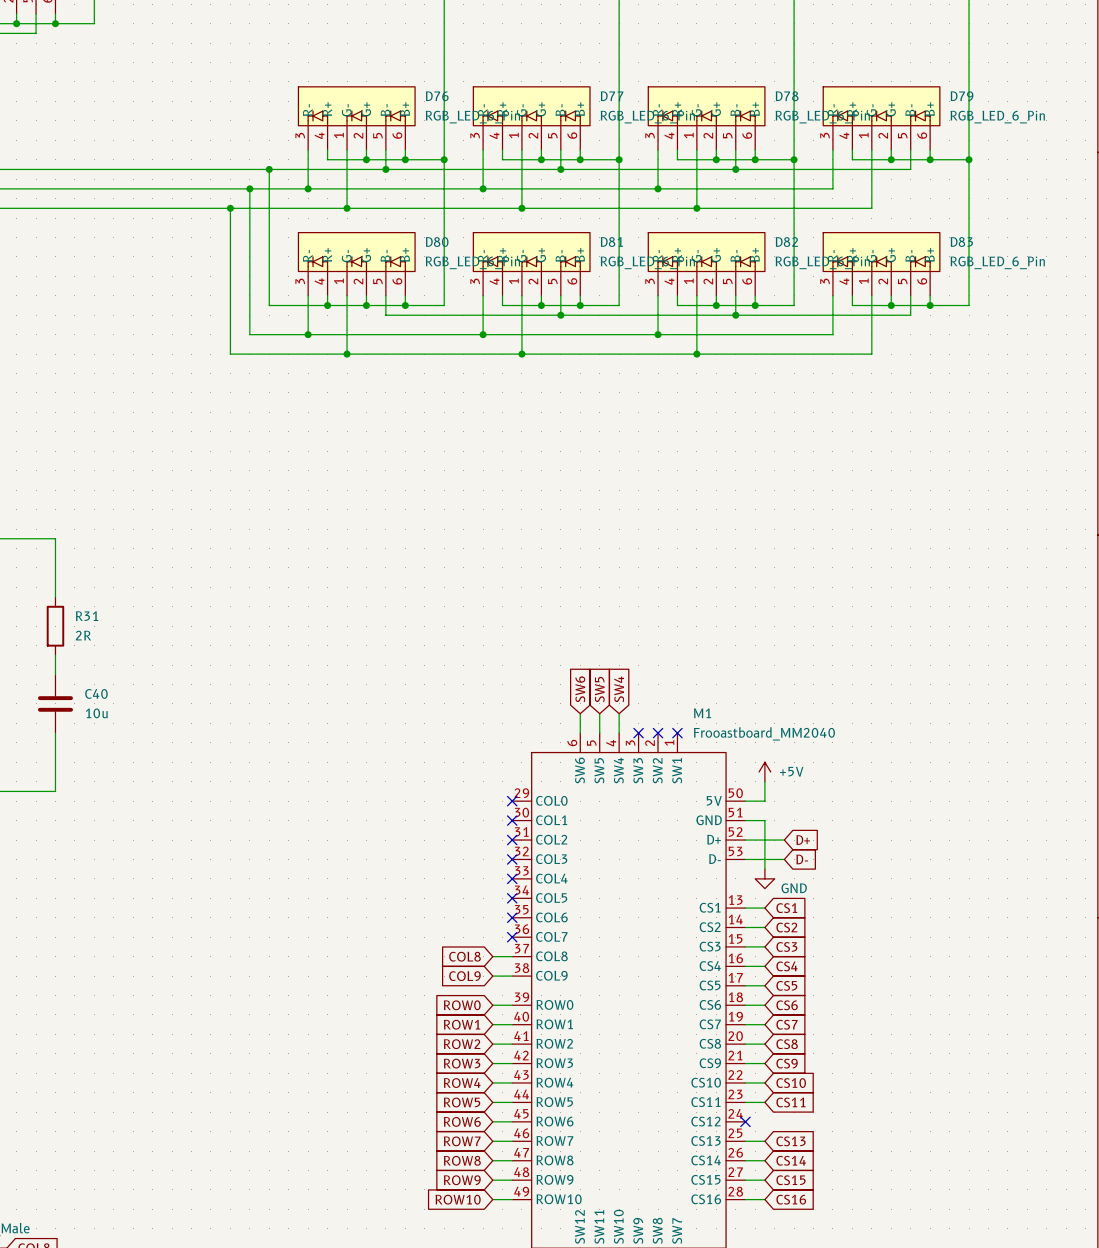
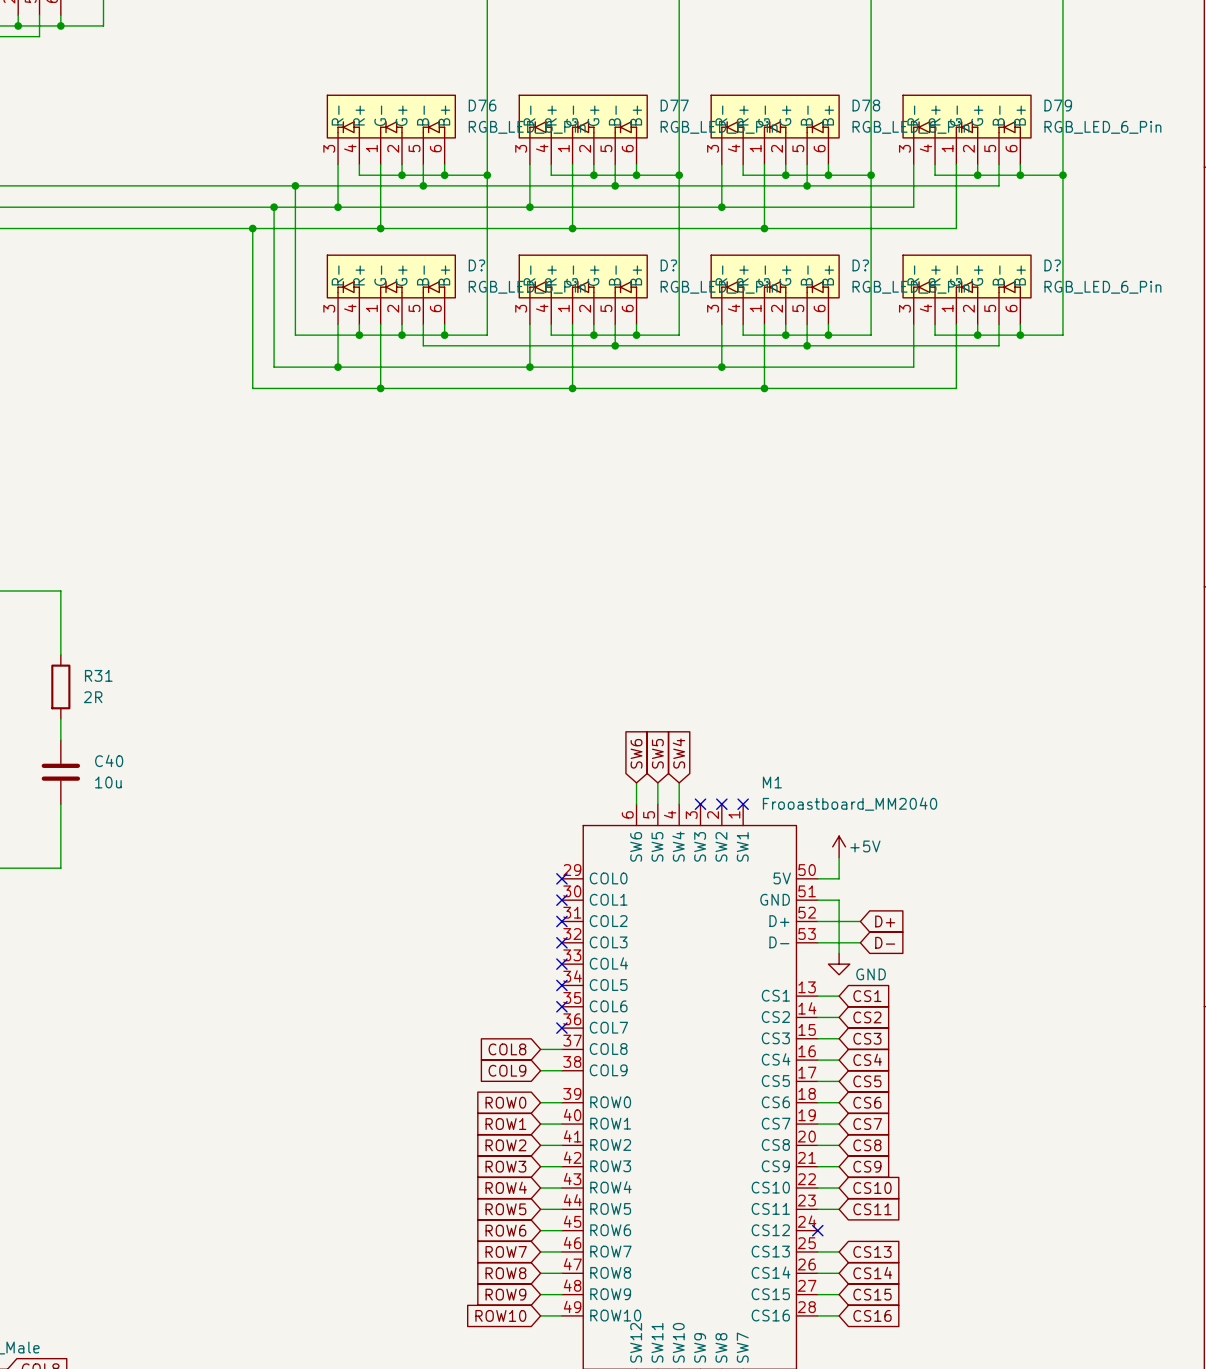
D80 name: D80 (437, 242) -> D? (476, 265)
D81 name: D81 (611, 242) -> D? (668, 265)
D82 name: D82 (786, 242) -> D? (860, 265)
D83 name: D83 (961, 242) -> D? (1052, 265)

